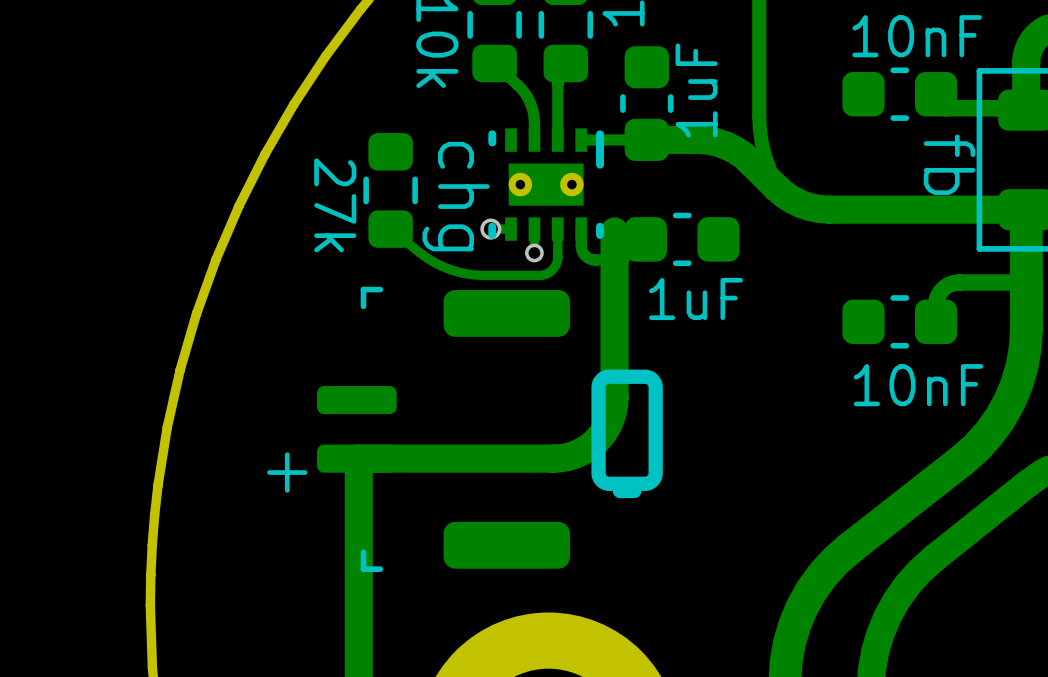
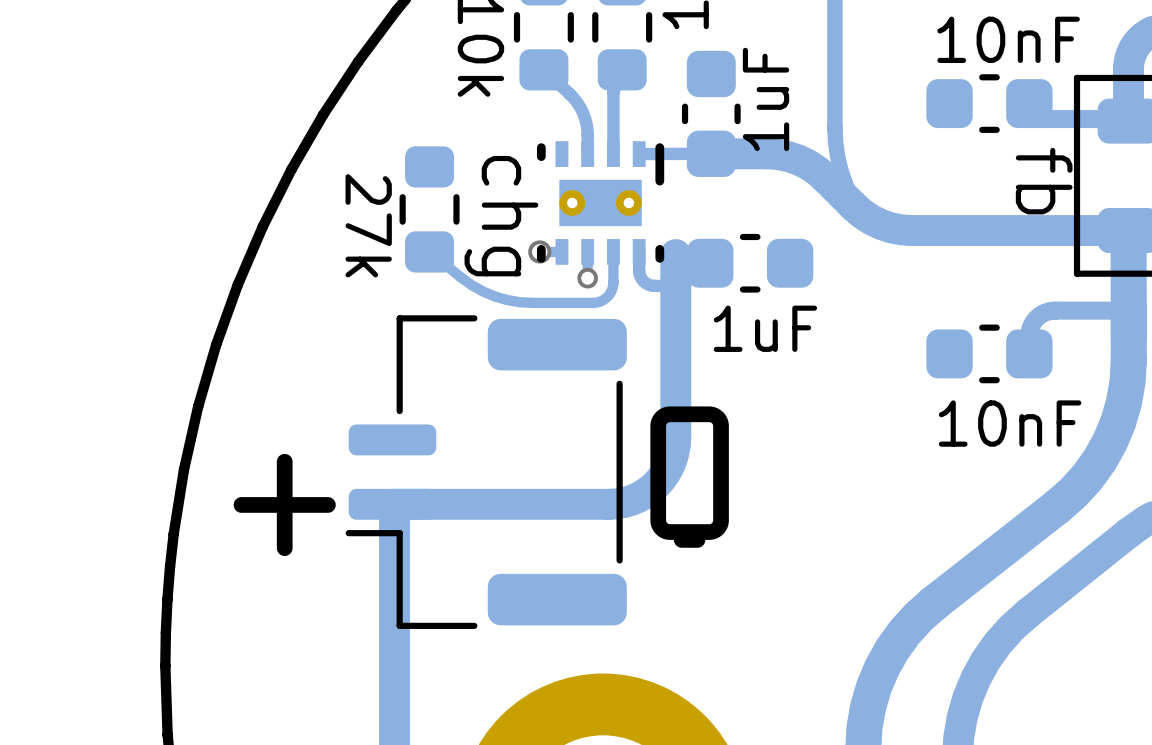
part footprint: [317, 286, 571, 572] -> [345, 315, 627, 629]
drawing: none -> [233, 453, 336, 556]
text: + (287, 472) -> none

